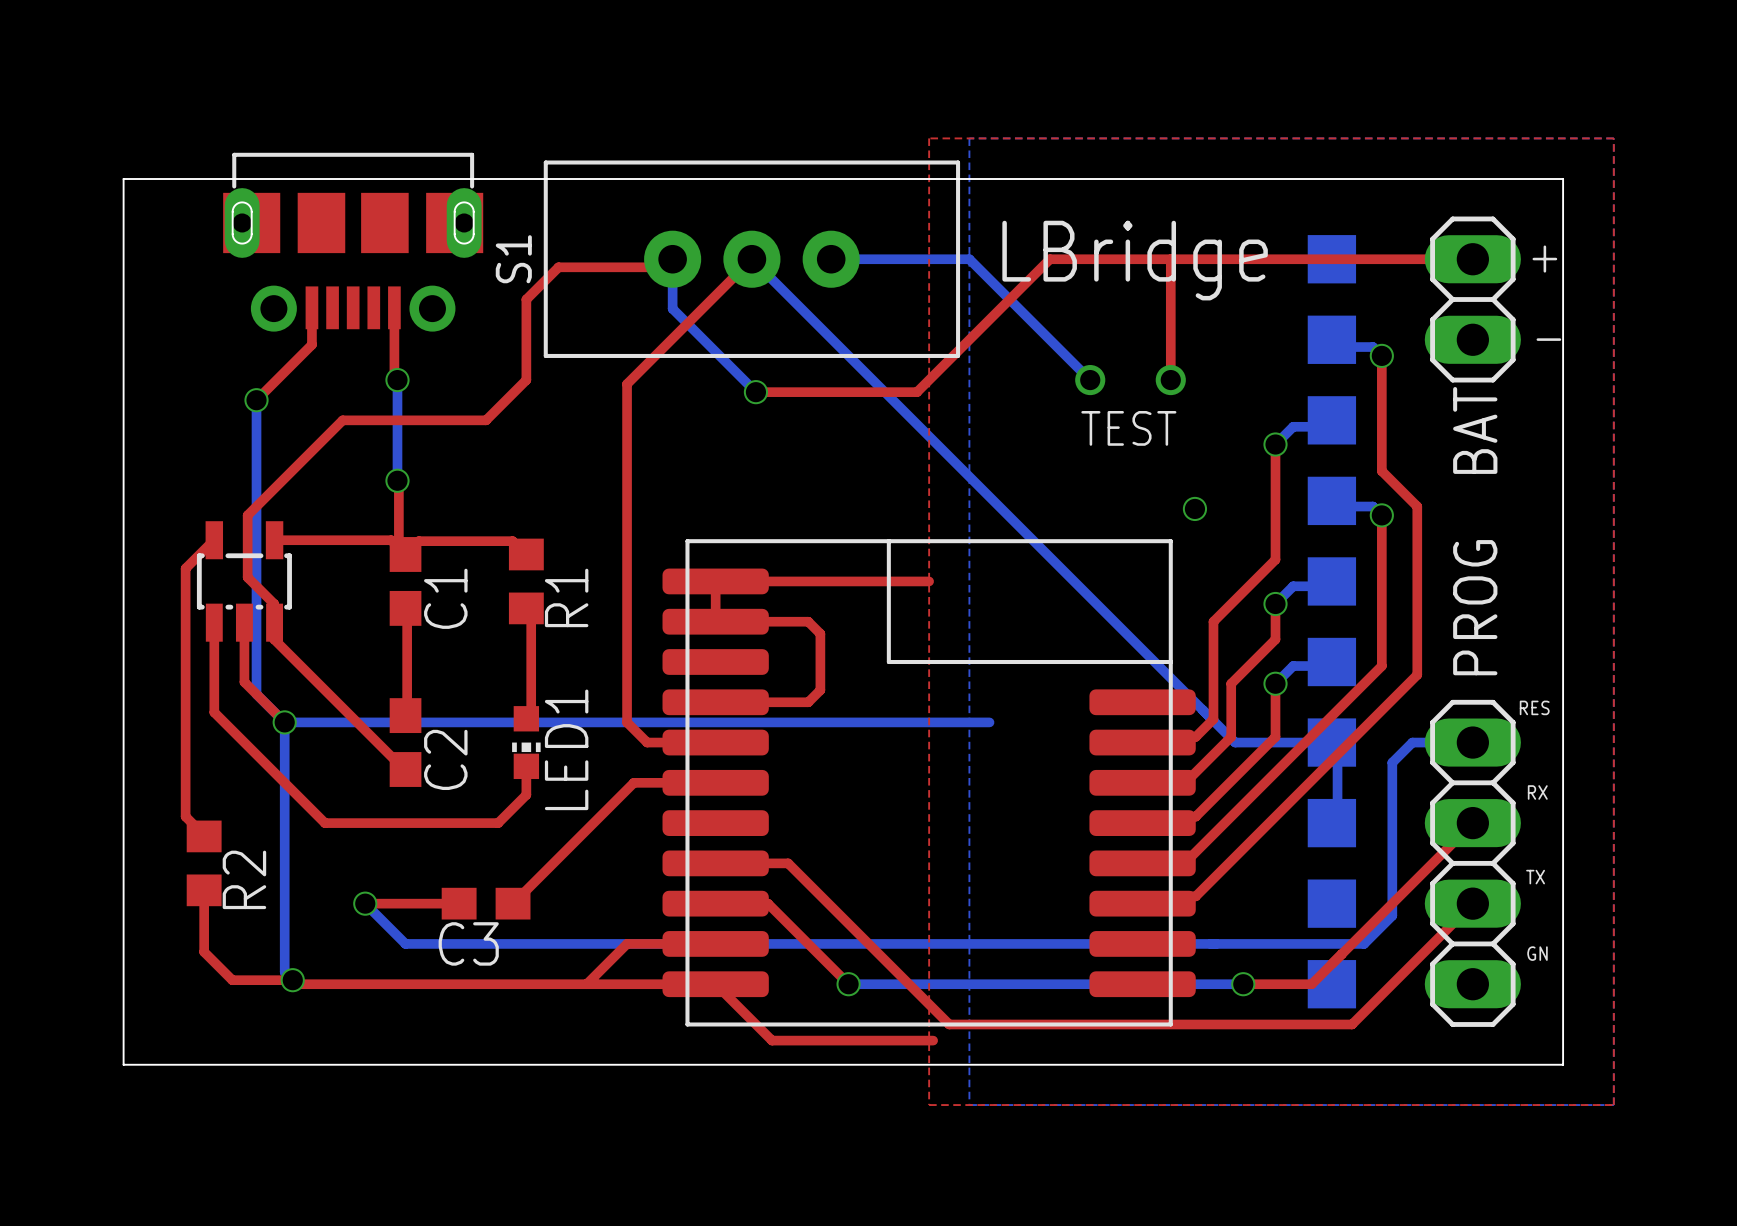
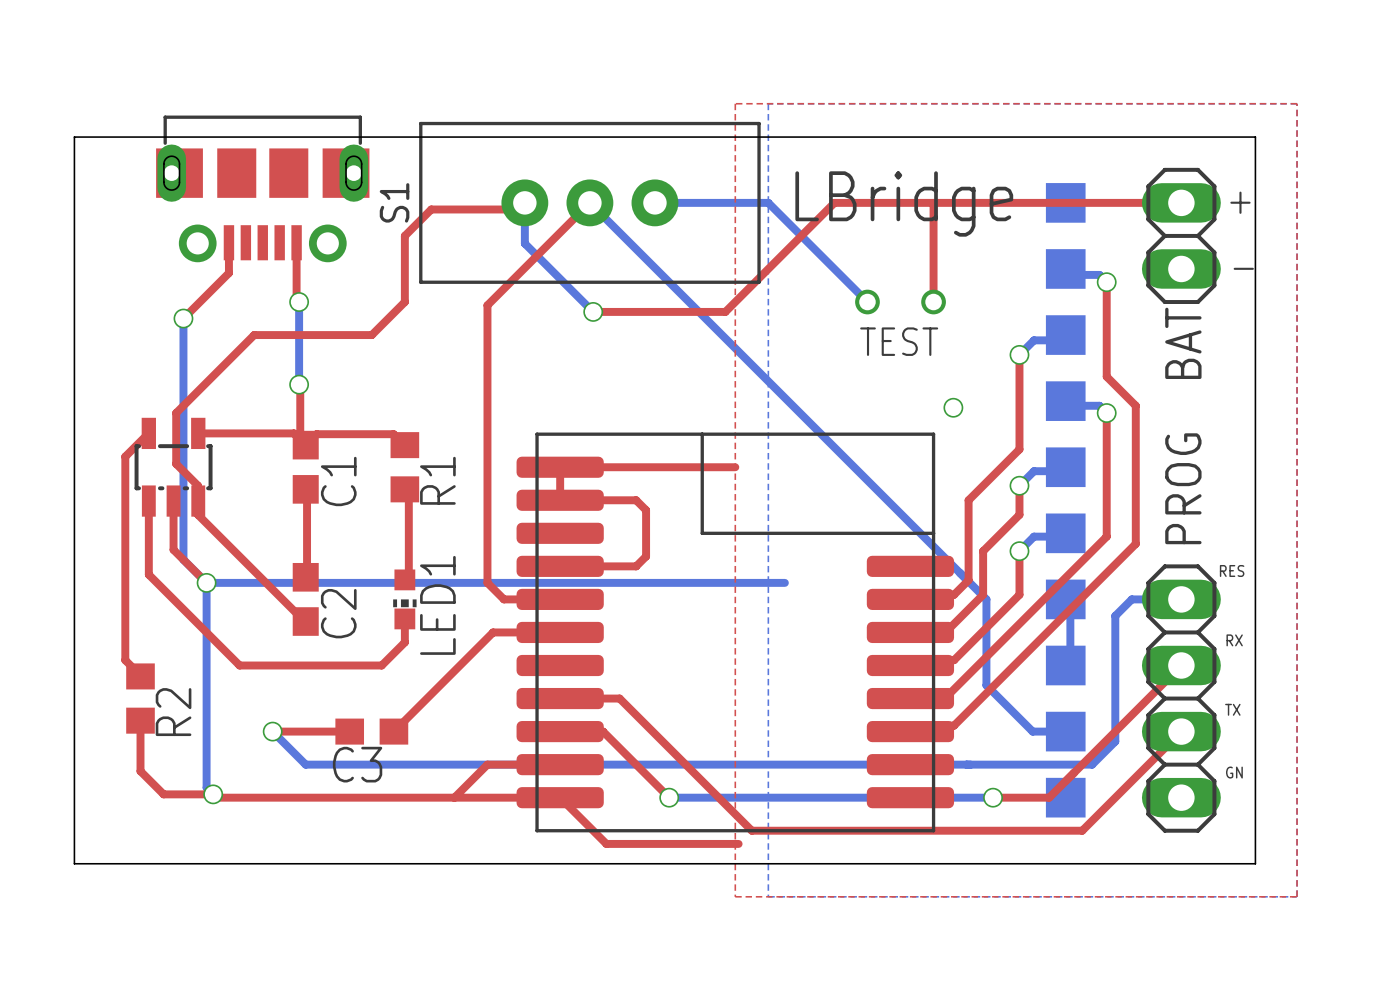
bottom track: (1235, 742) (1331, 742) -> (986, 599) (986, 685) (1032, 731) (1065, 731)

